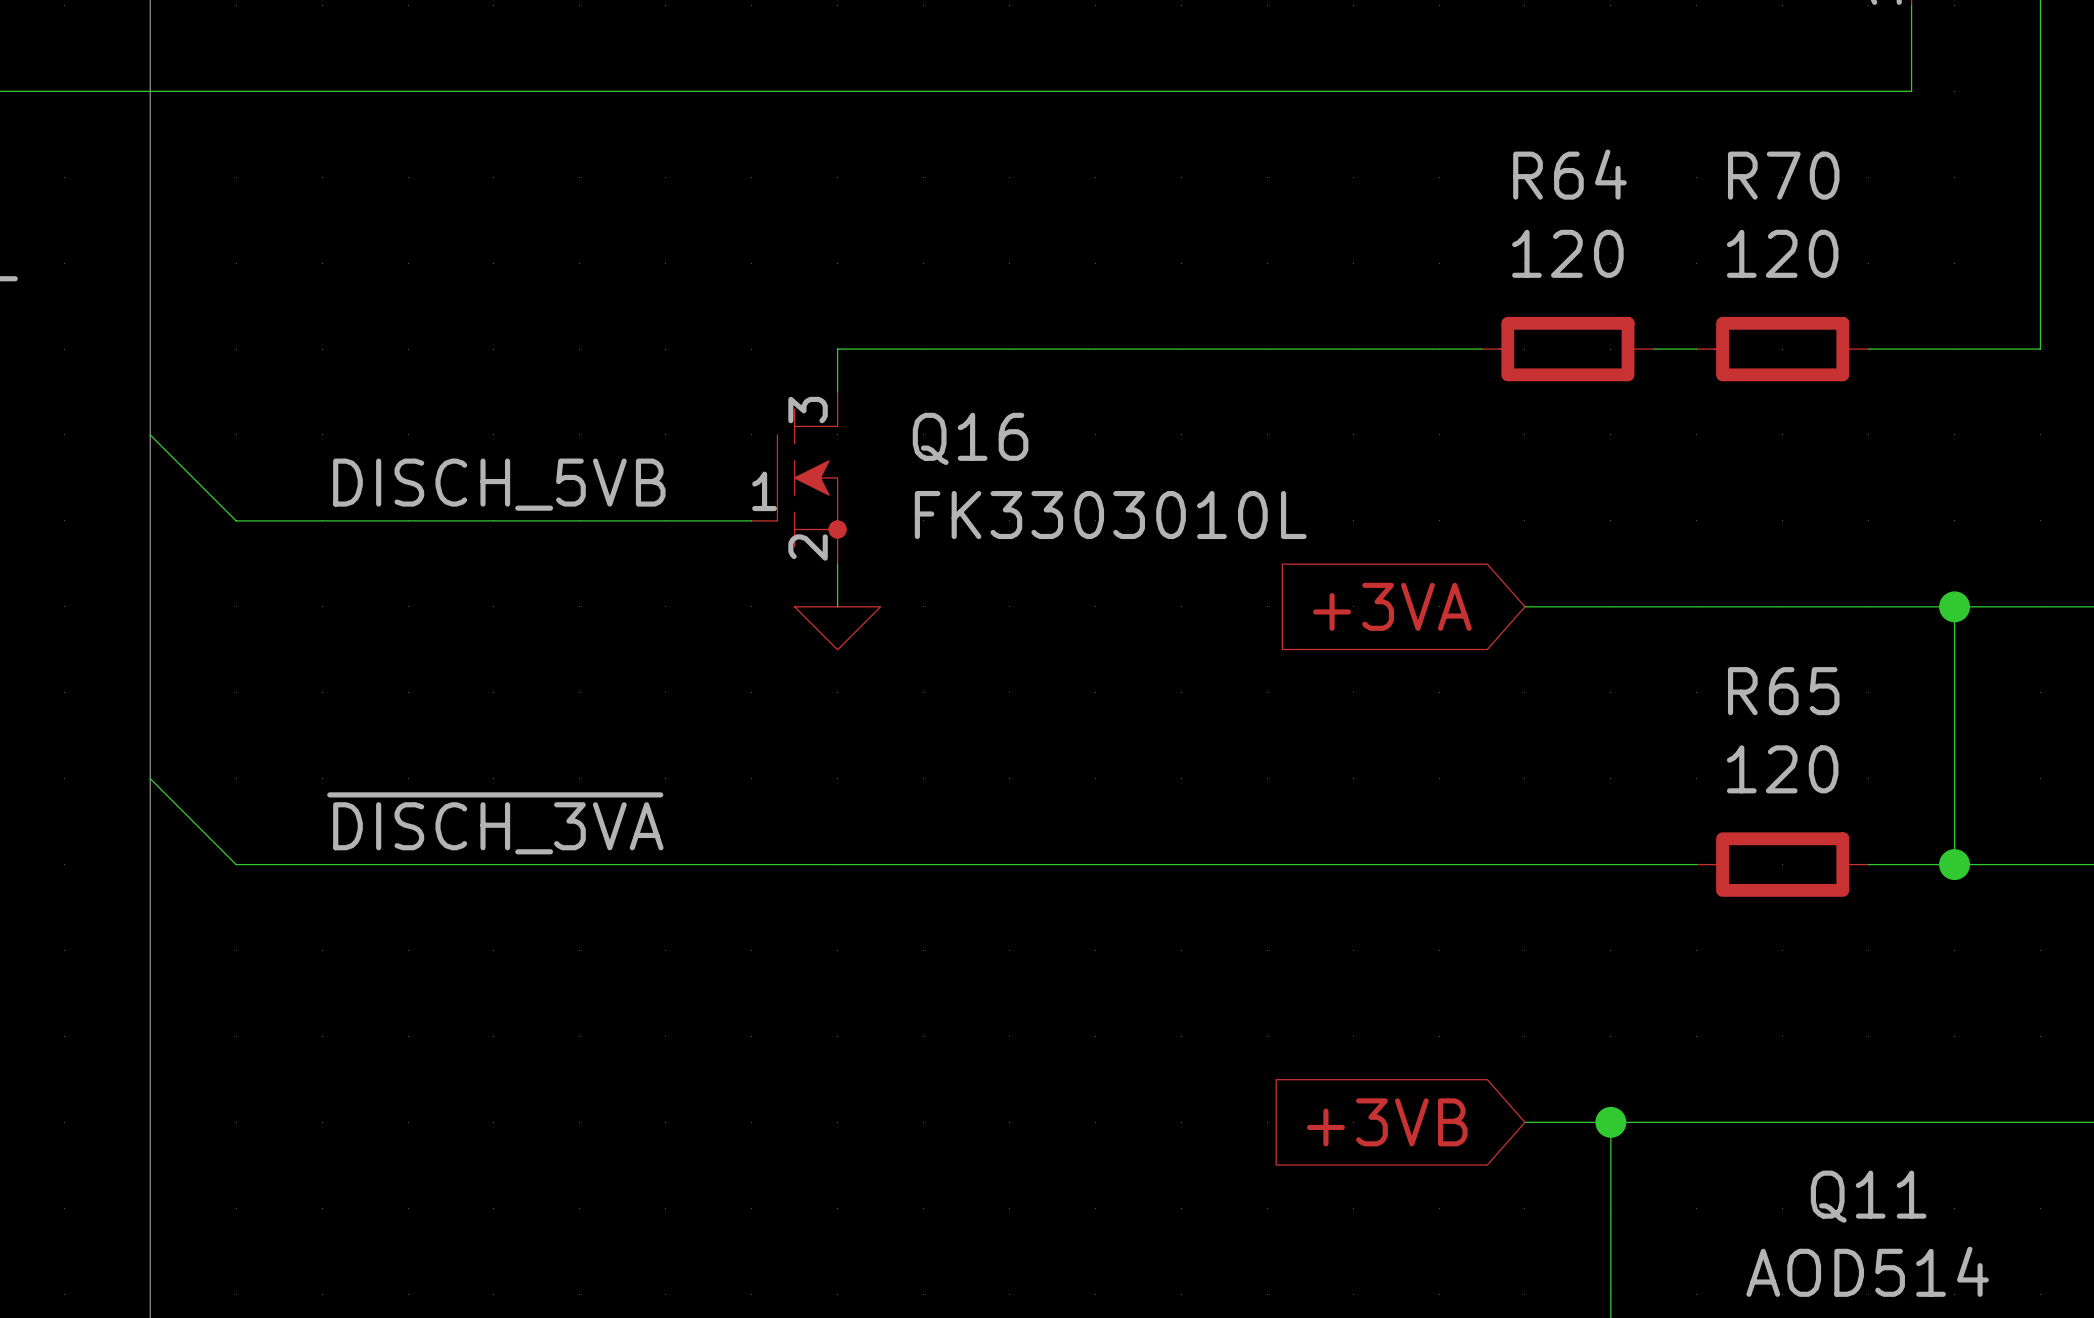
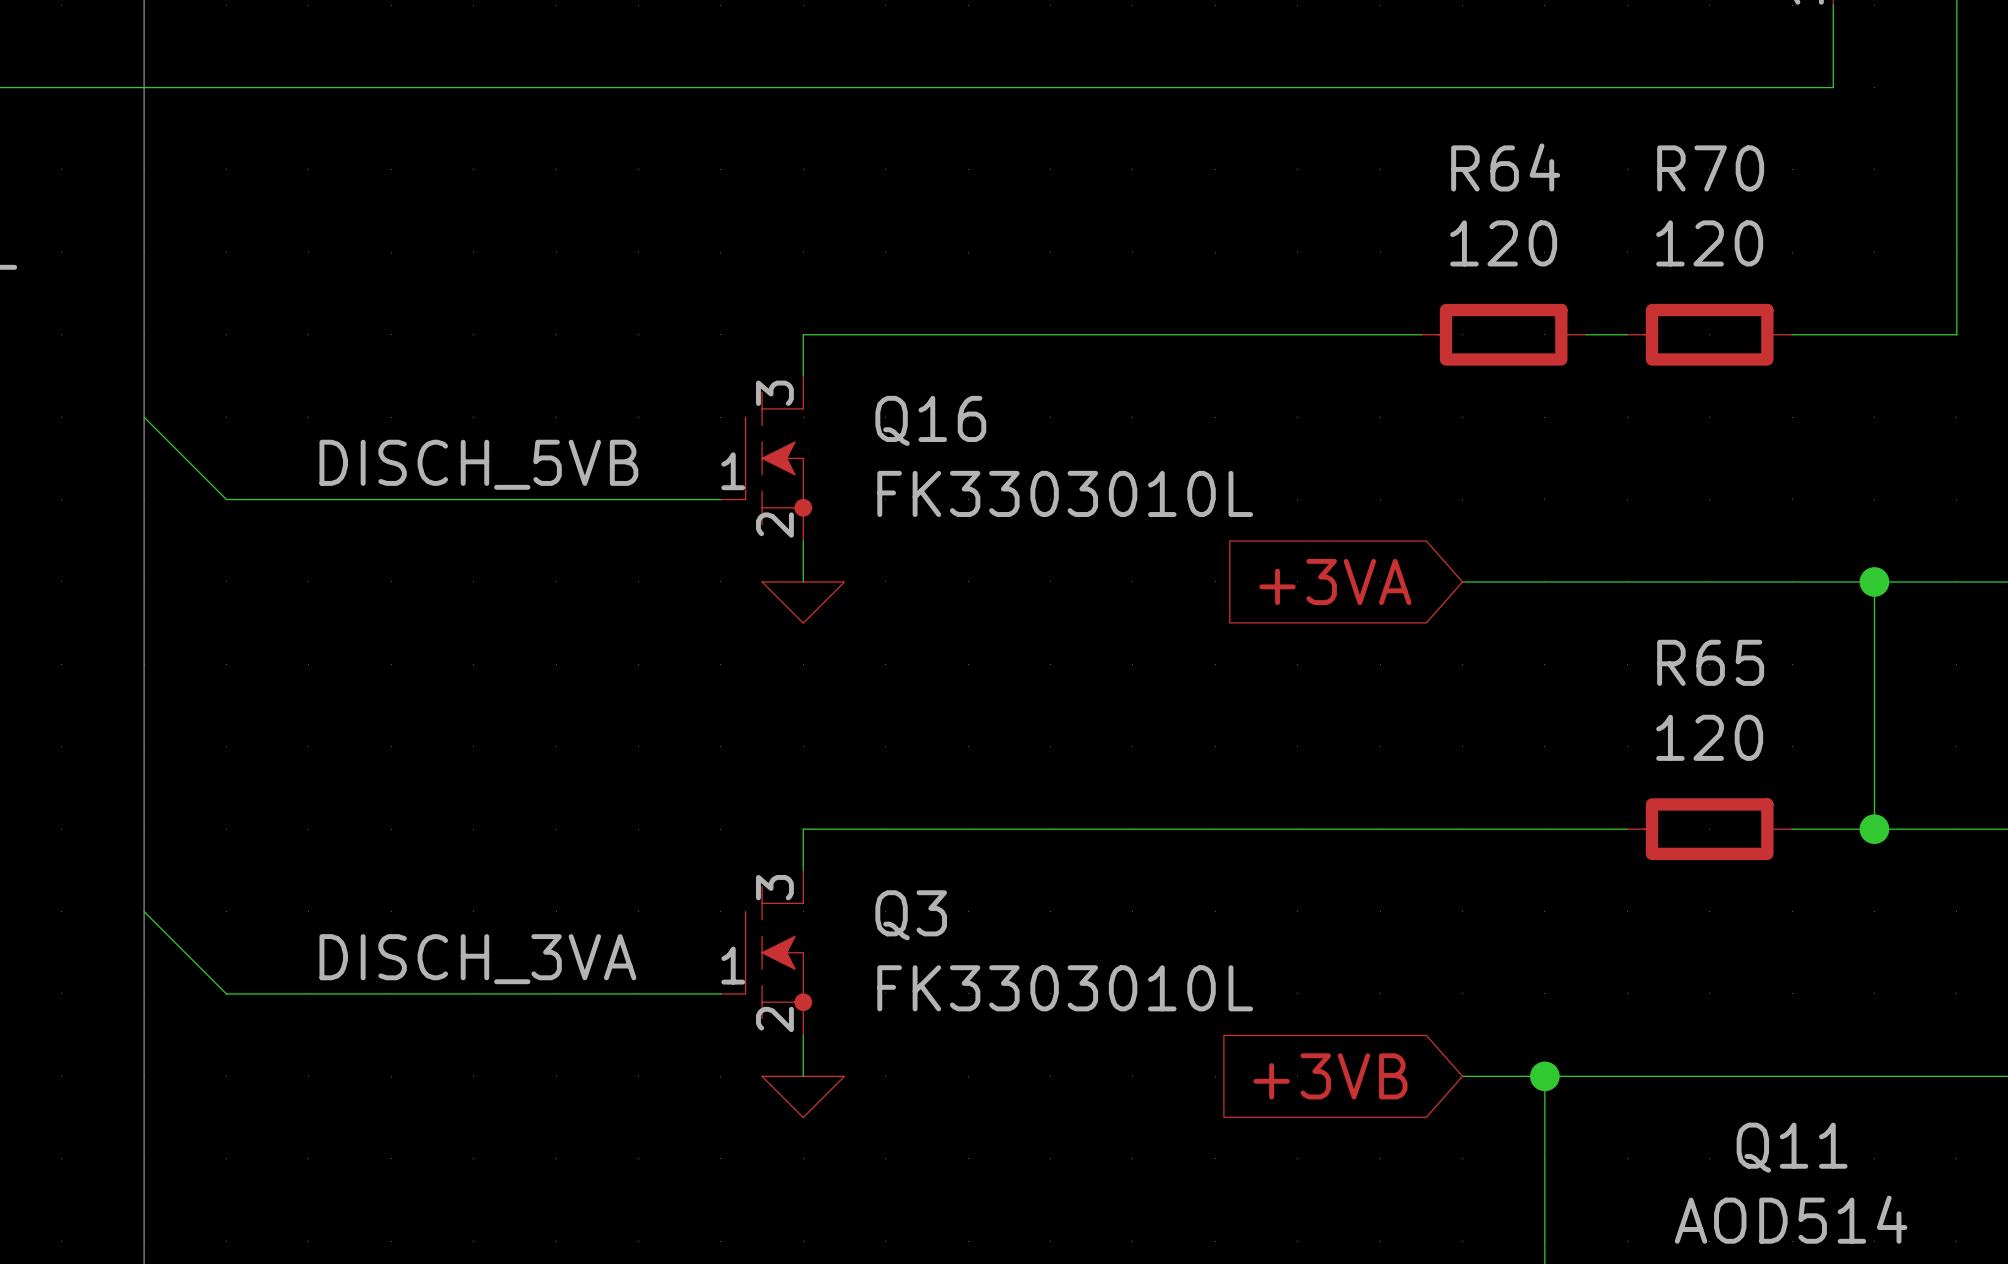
wire: (150, 778) (236, 864) (837, 864) -> (803, 870) (803, 829)
label: ~{DISCH_3VA} (495, 823) -> none
wire: none -> (144, 911) (226, 993) (720, 993)
Q3: none -> FK3303010L (766, 952)
label: none -> DISCH_3VA (477, 959)
wire: none -> (803, 1035) (803, 1076)
power symbol: none -> (803, 1096)

